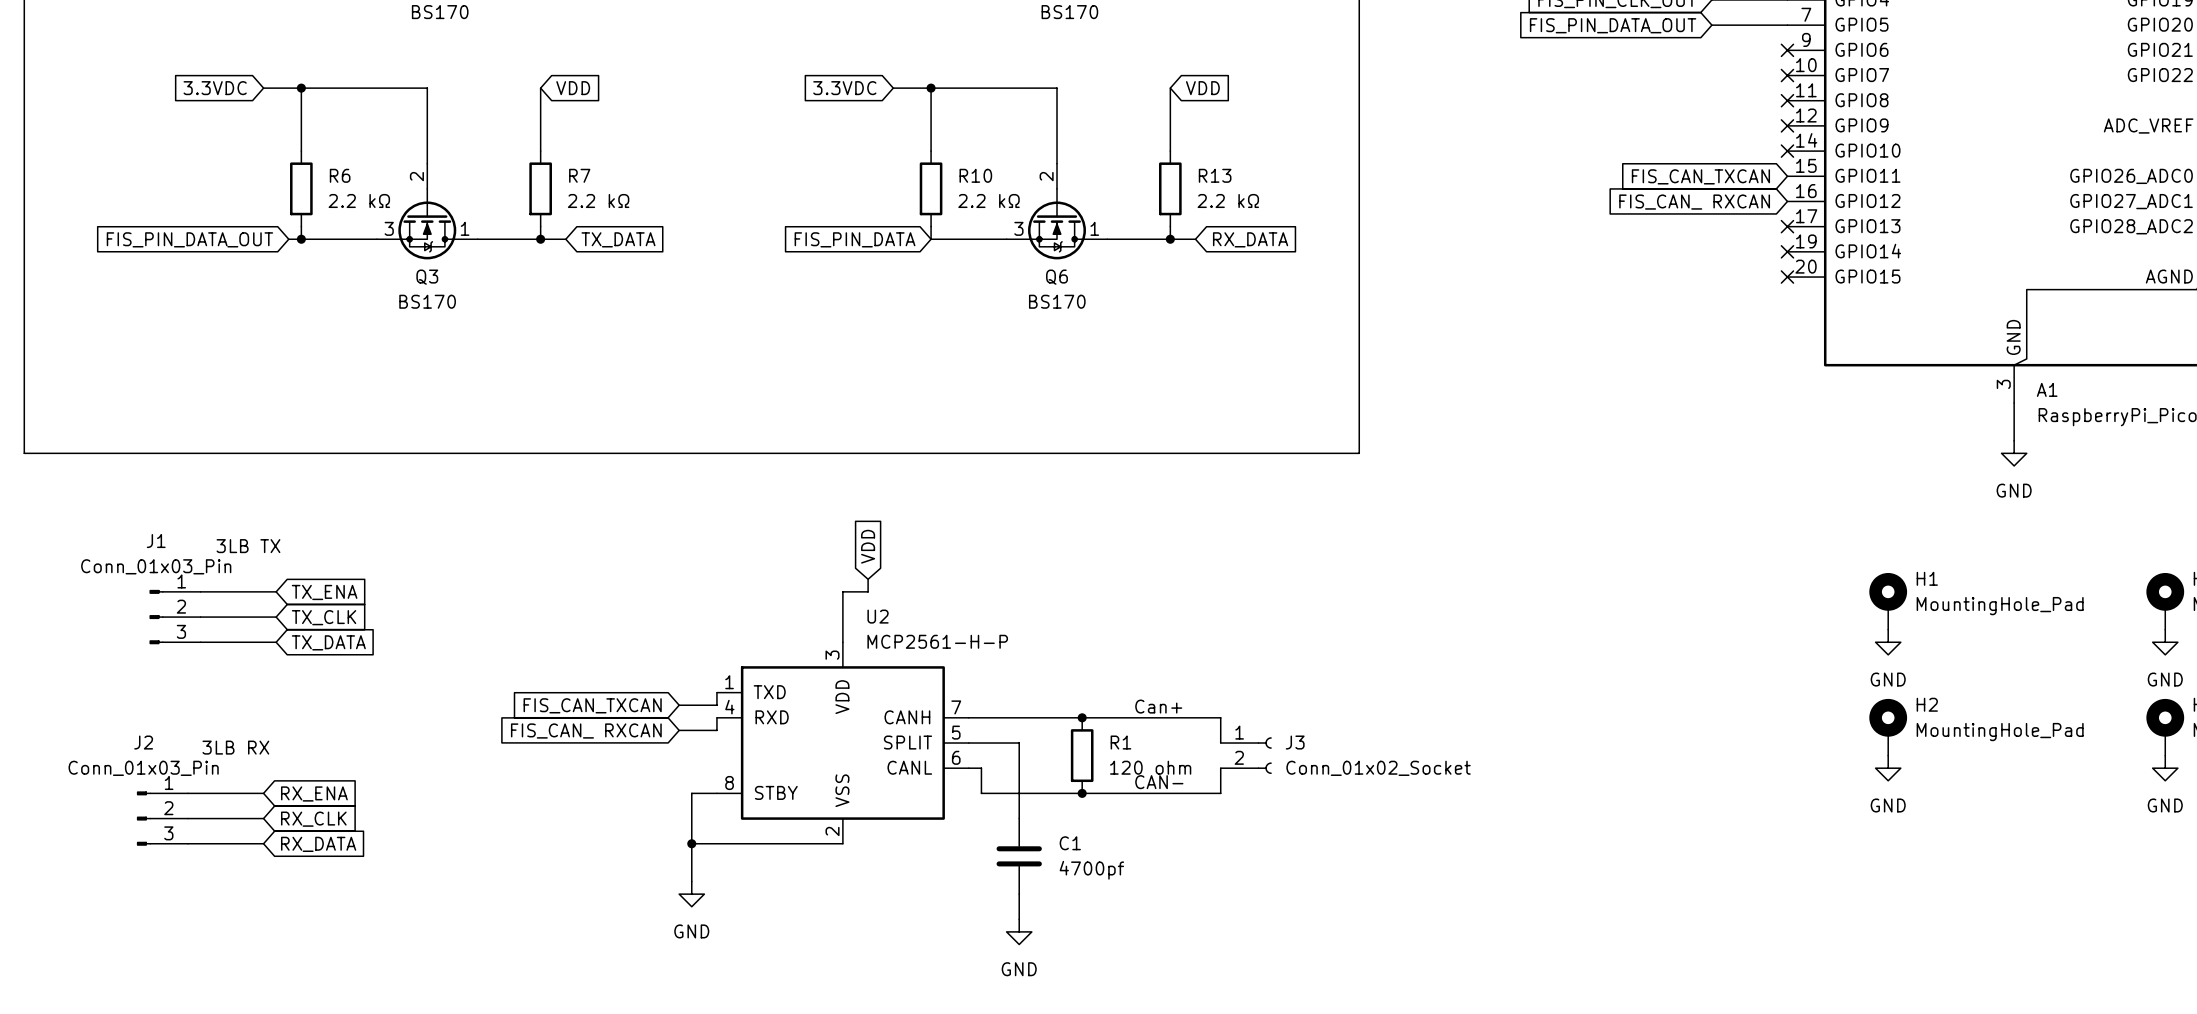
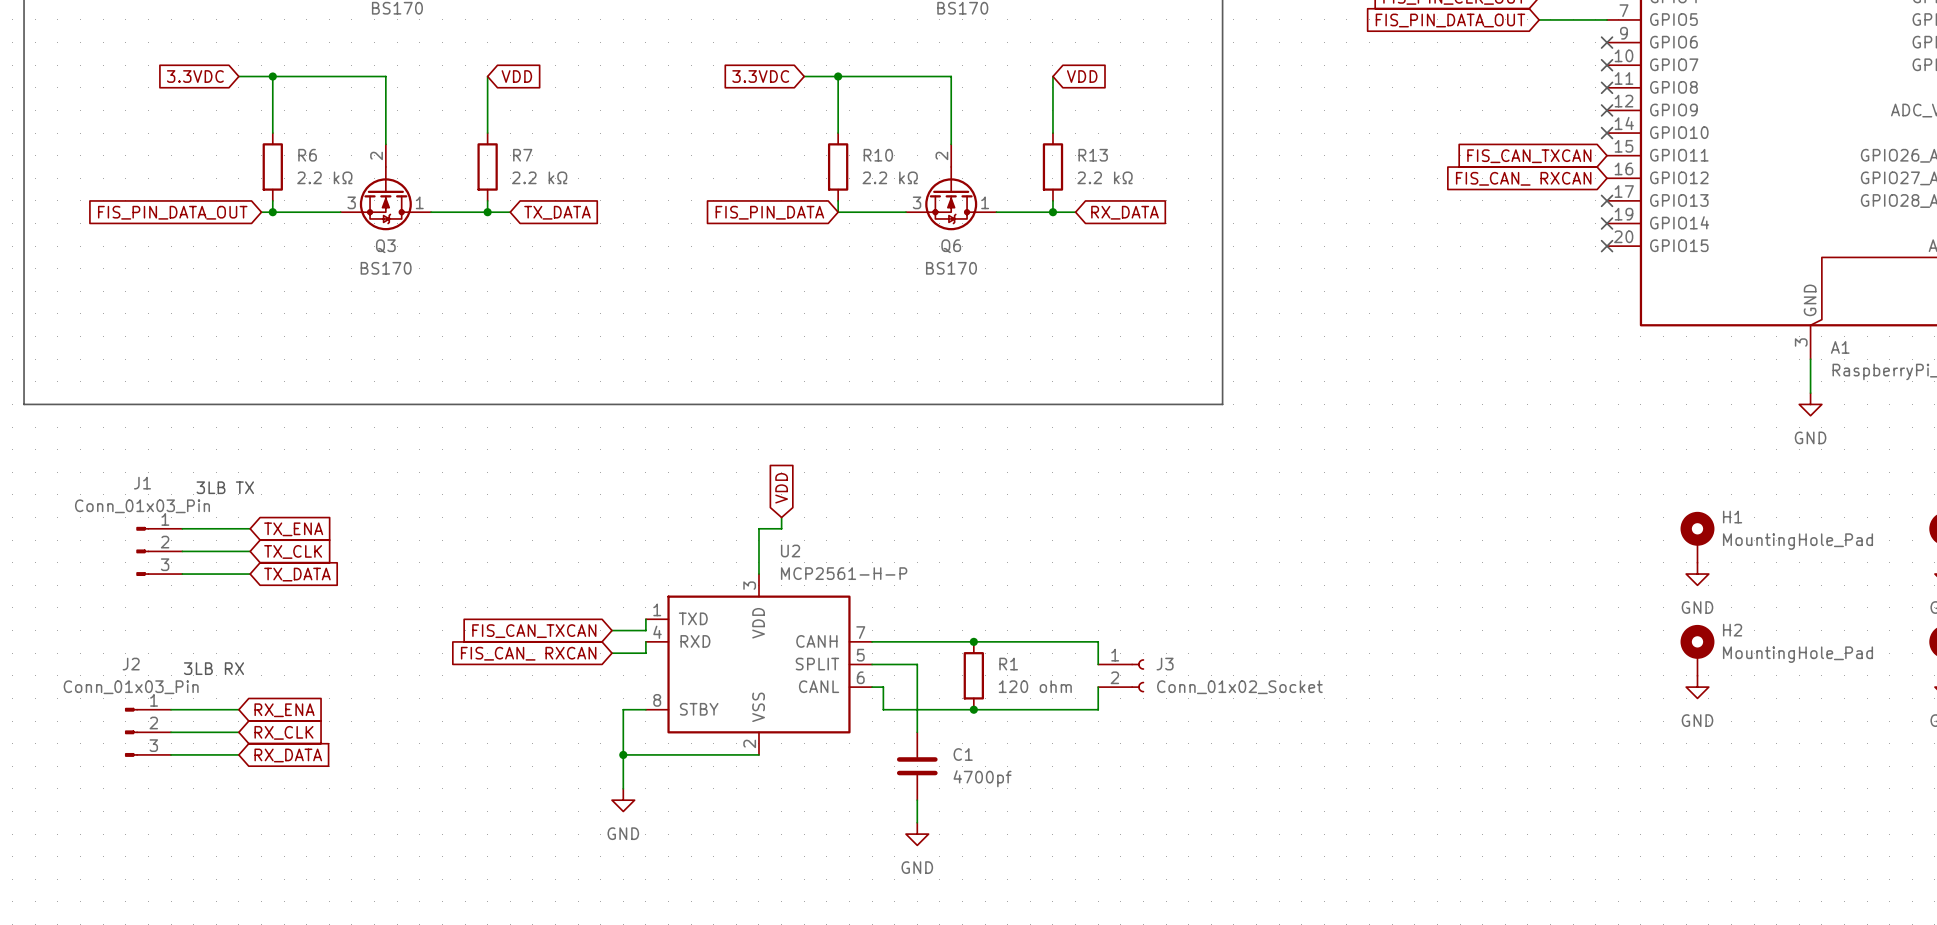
label: Can+ (1158, 706) -> none
label: CAN- (1159, 782) -> none

